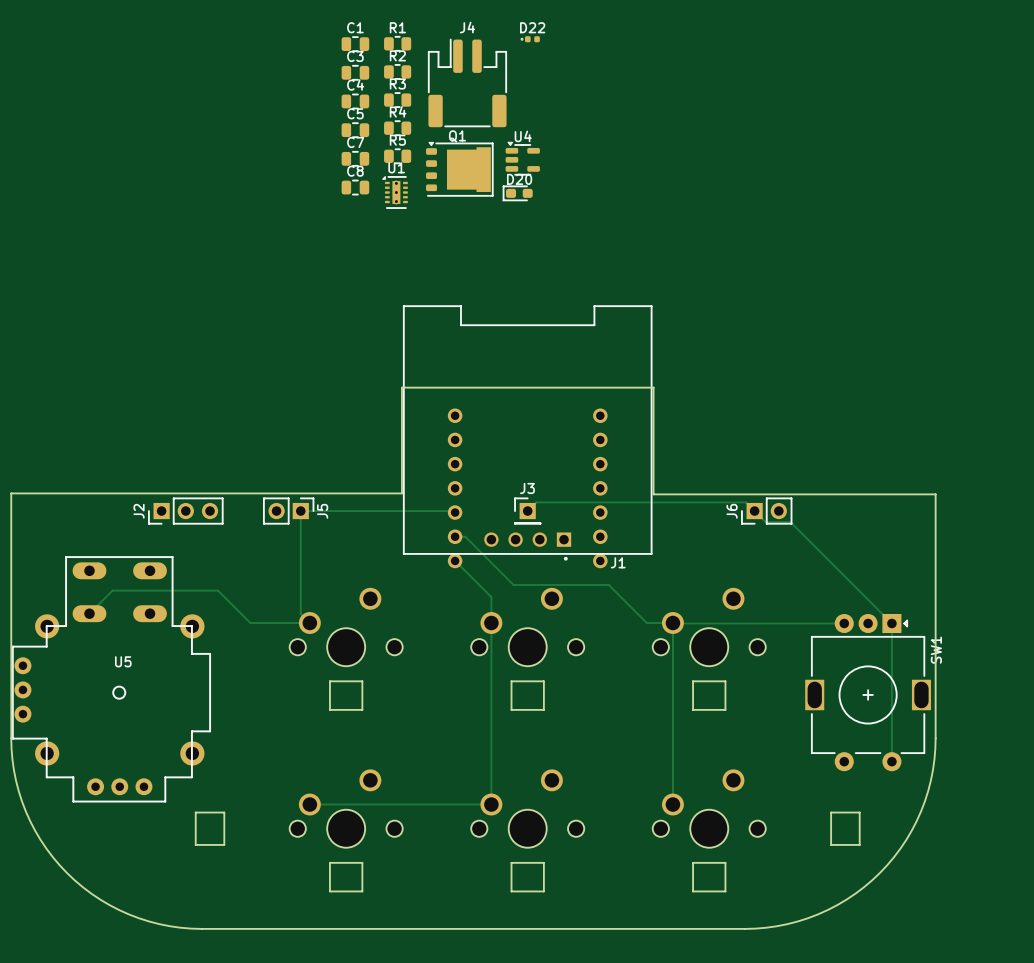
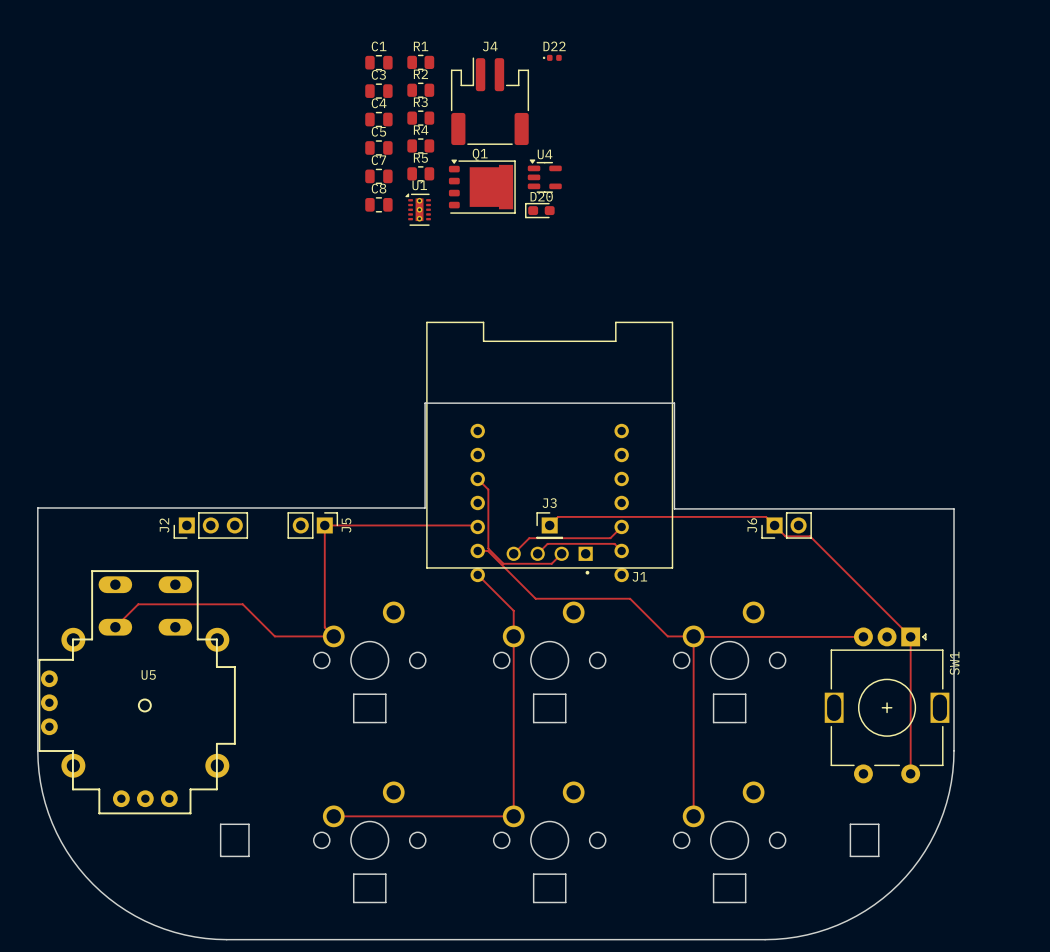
track: none -> (477, 478) (488, 489) (488, 548) (503, 563) (551, 563) (561, 553)
track: none -> (621, 526) (610, 538) (529, 538) (513, 553)
track: none -> (621, 550) (614, 543) (547, 543) (537, 553)

